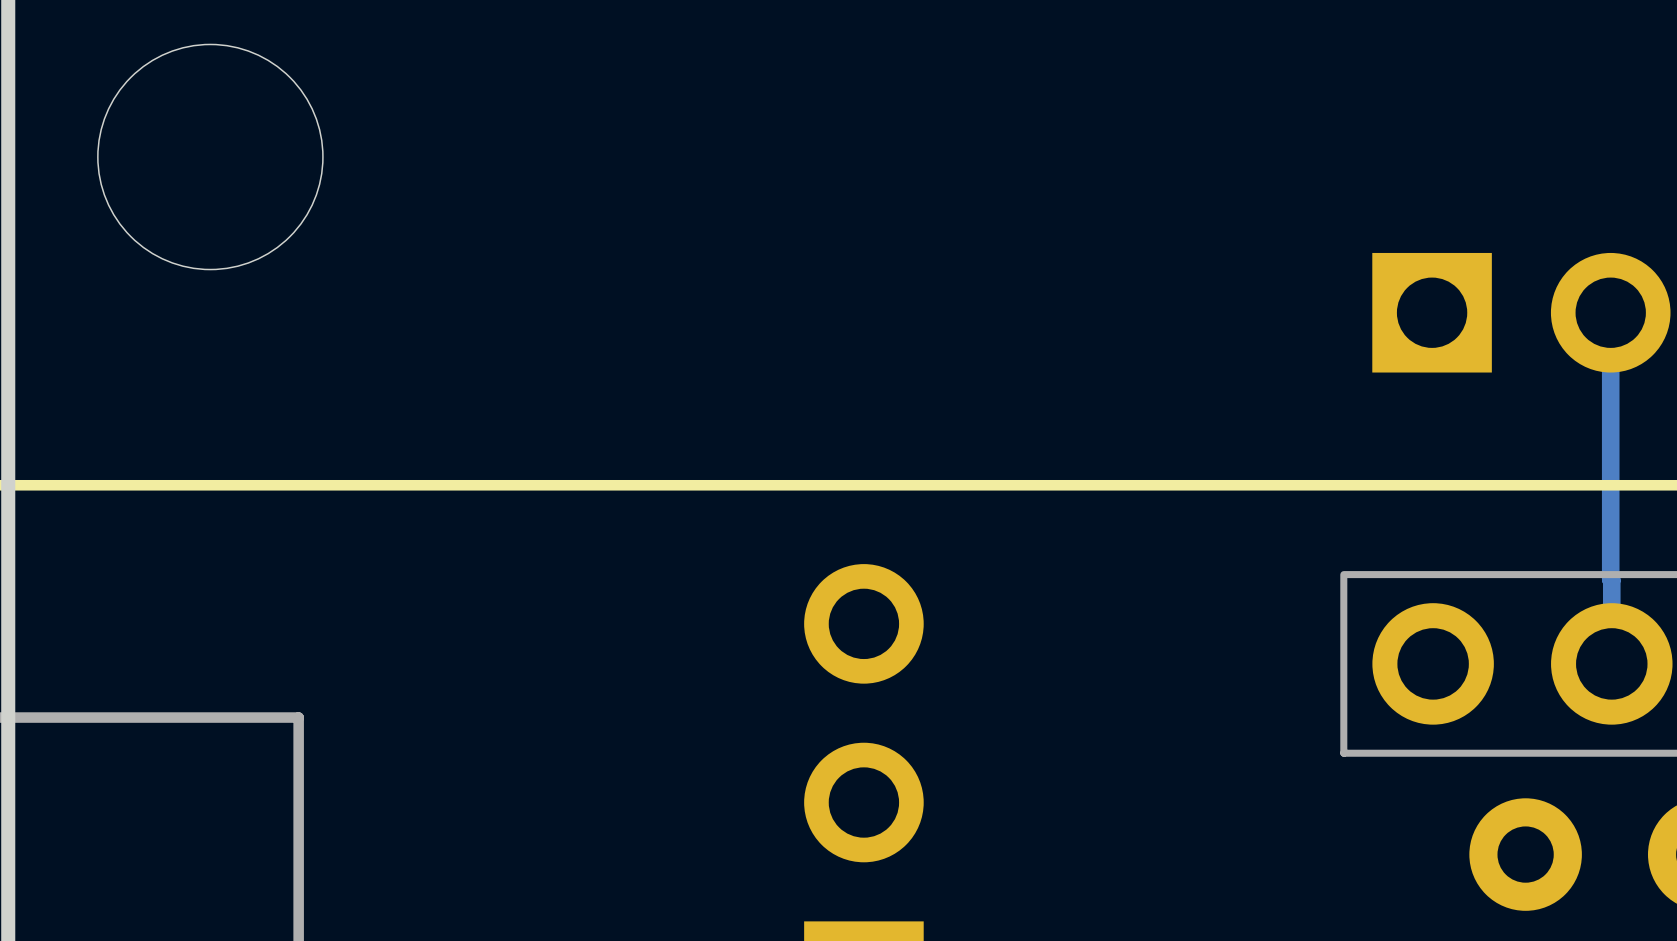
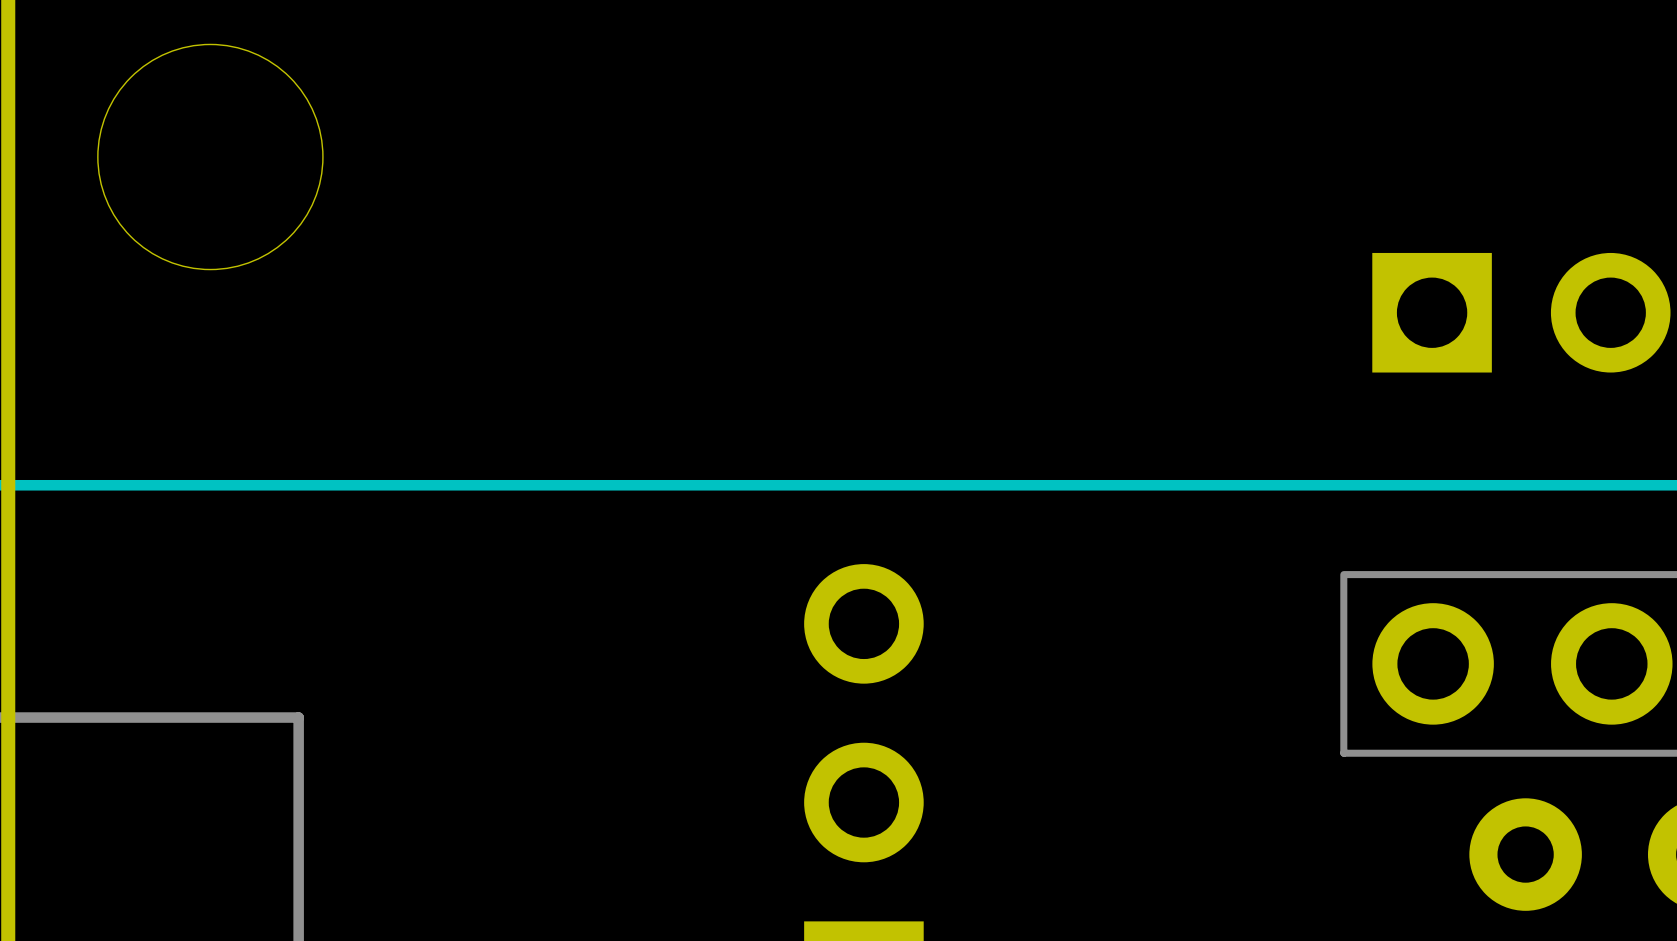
track: (1610, 312) (1611, 663) -> none

